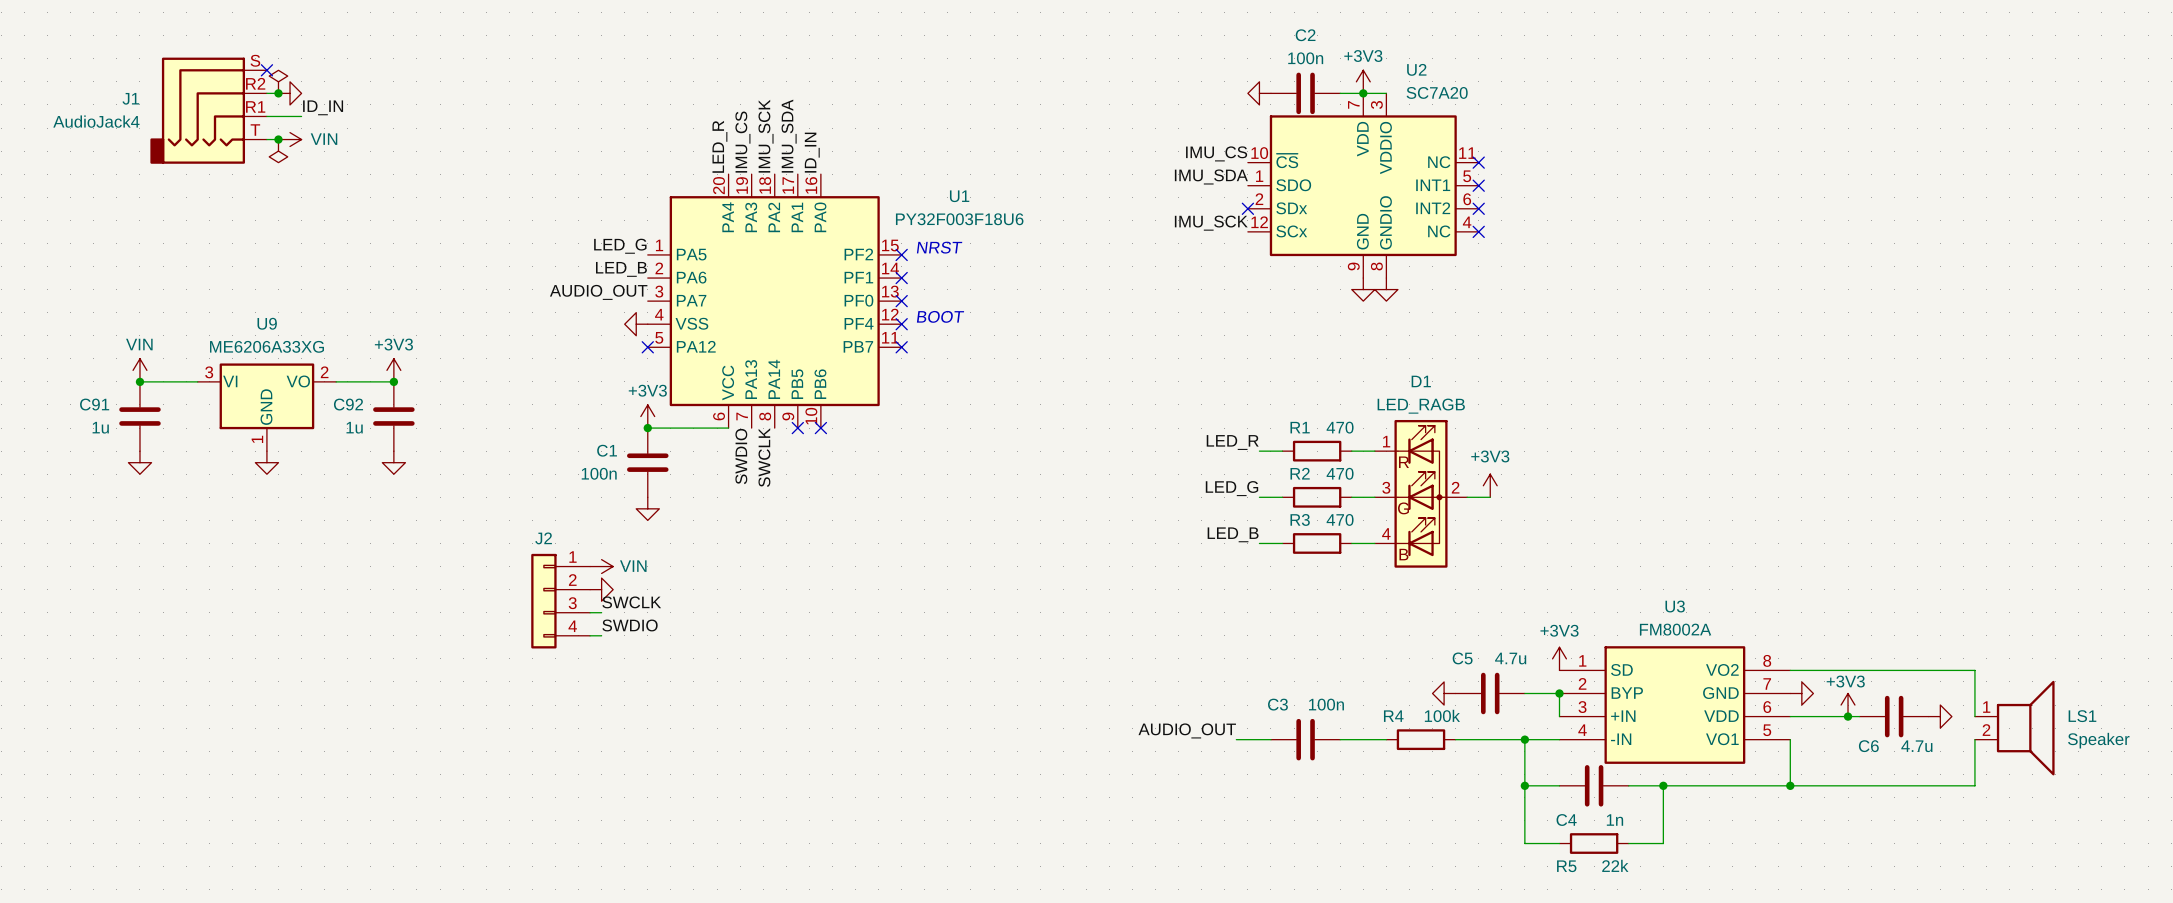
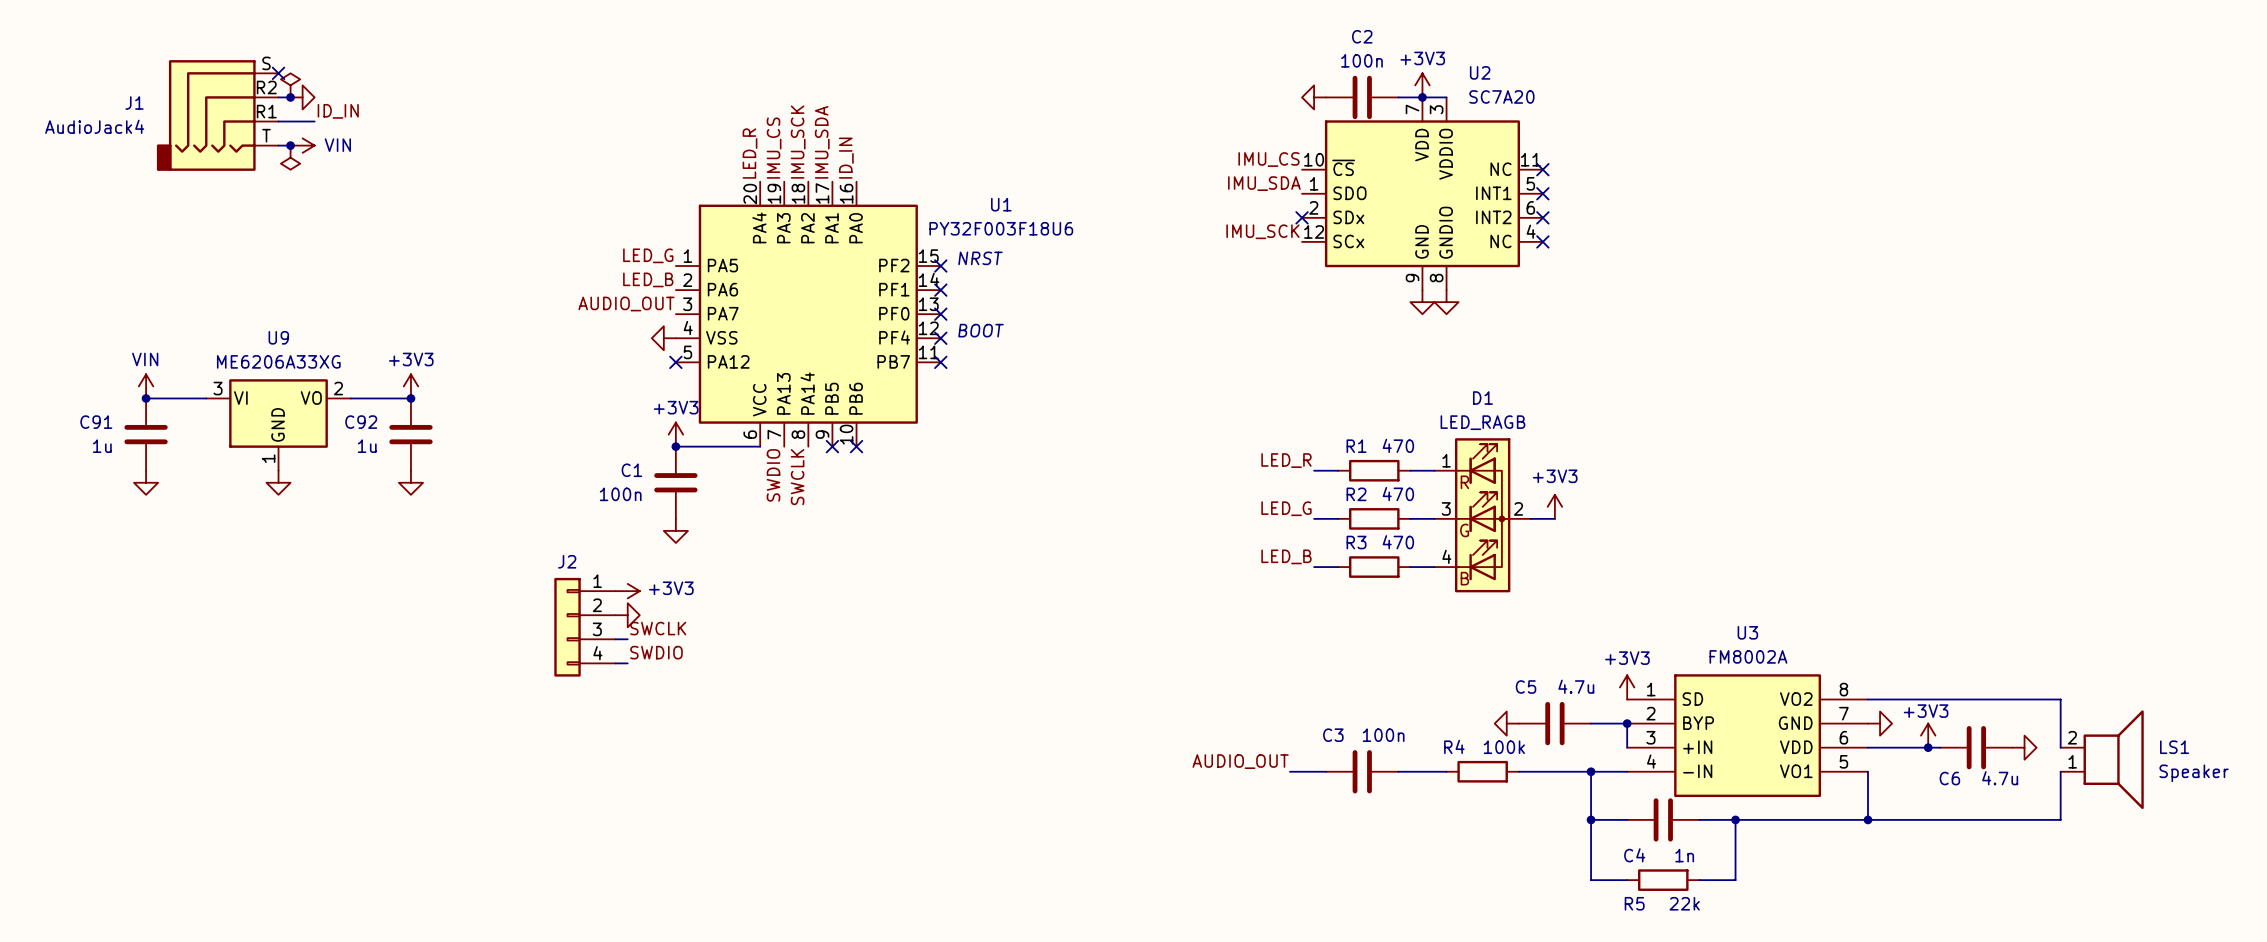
power symbol: VIN (601, 566) -> +3V3 (627, 591)
LS1 flip: as is (2025, 728) -> up-down (2113, 759)

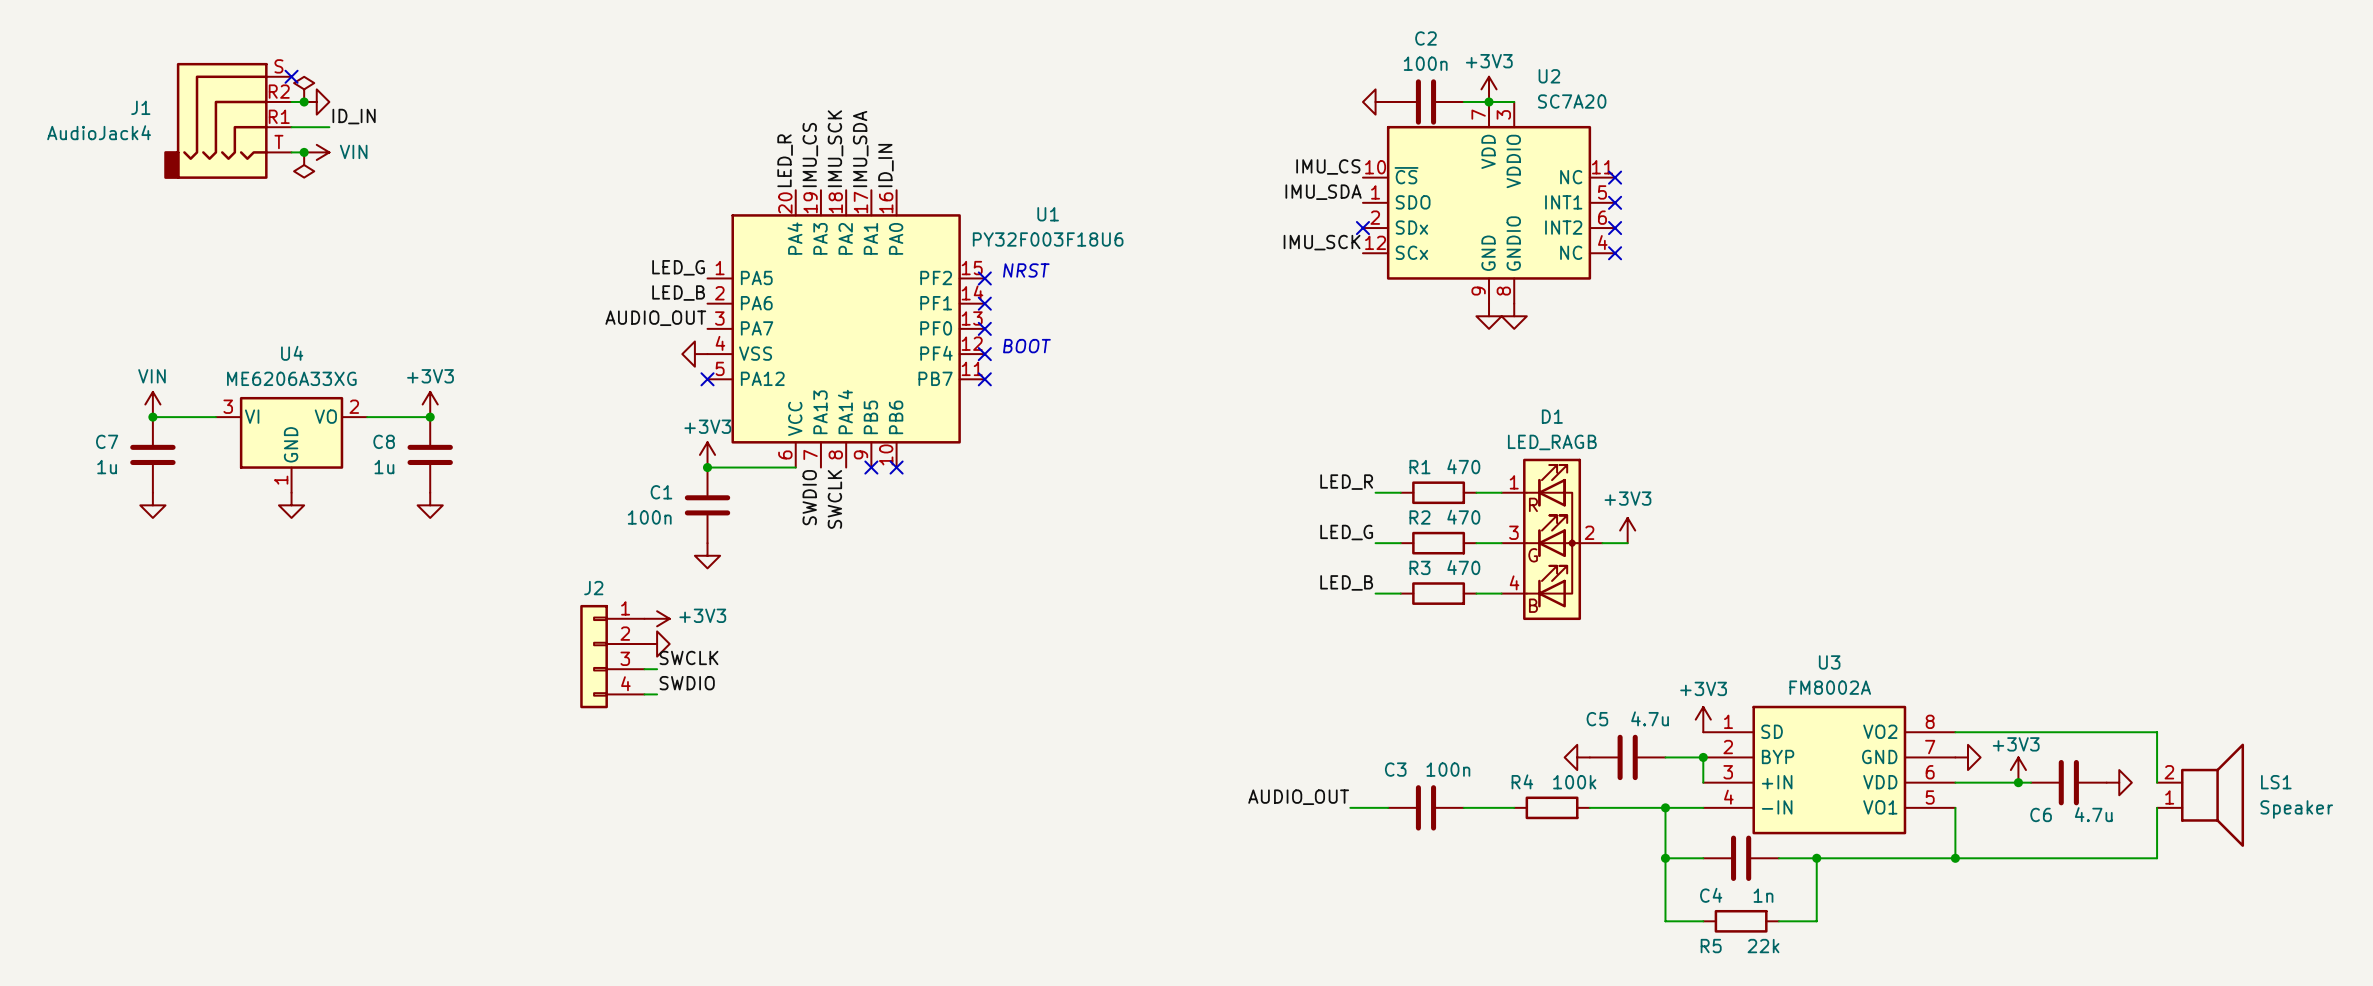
U9 name: U9 (278, 337) -> U4 (292, 353)
C91 name: C91 (96, 422) -> C7 (107, 441)
C92 name: C92 (361, 422) -> C8 (384, 441)

